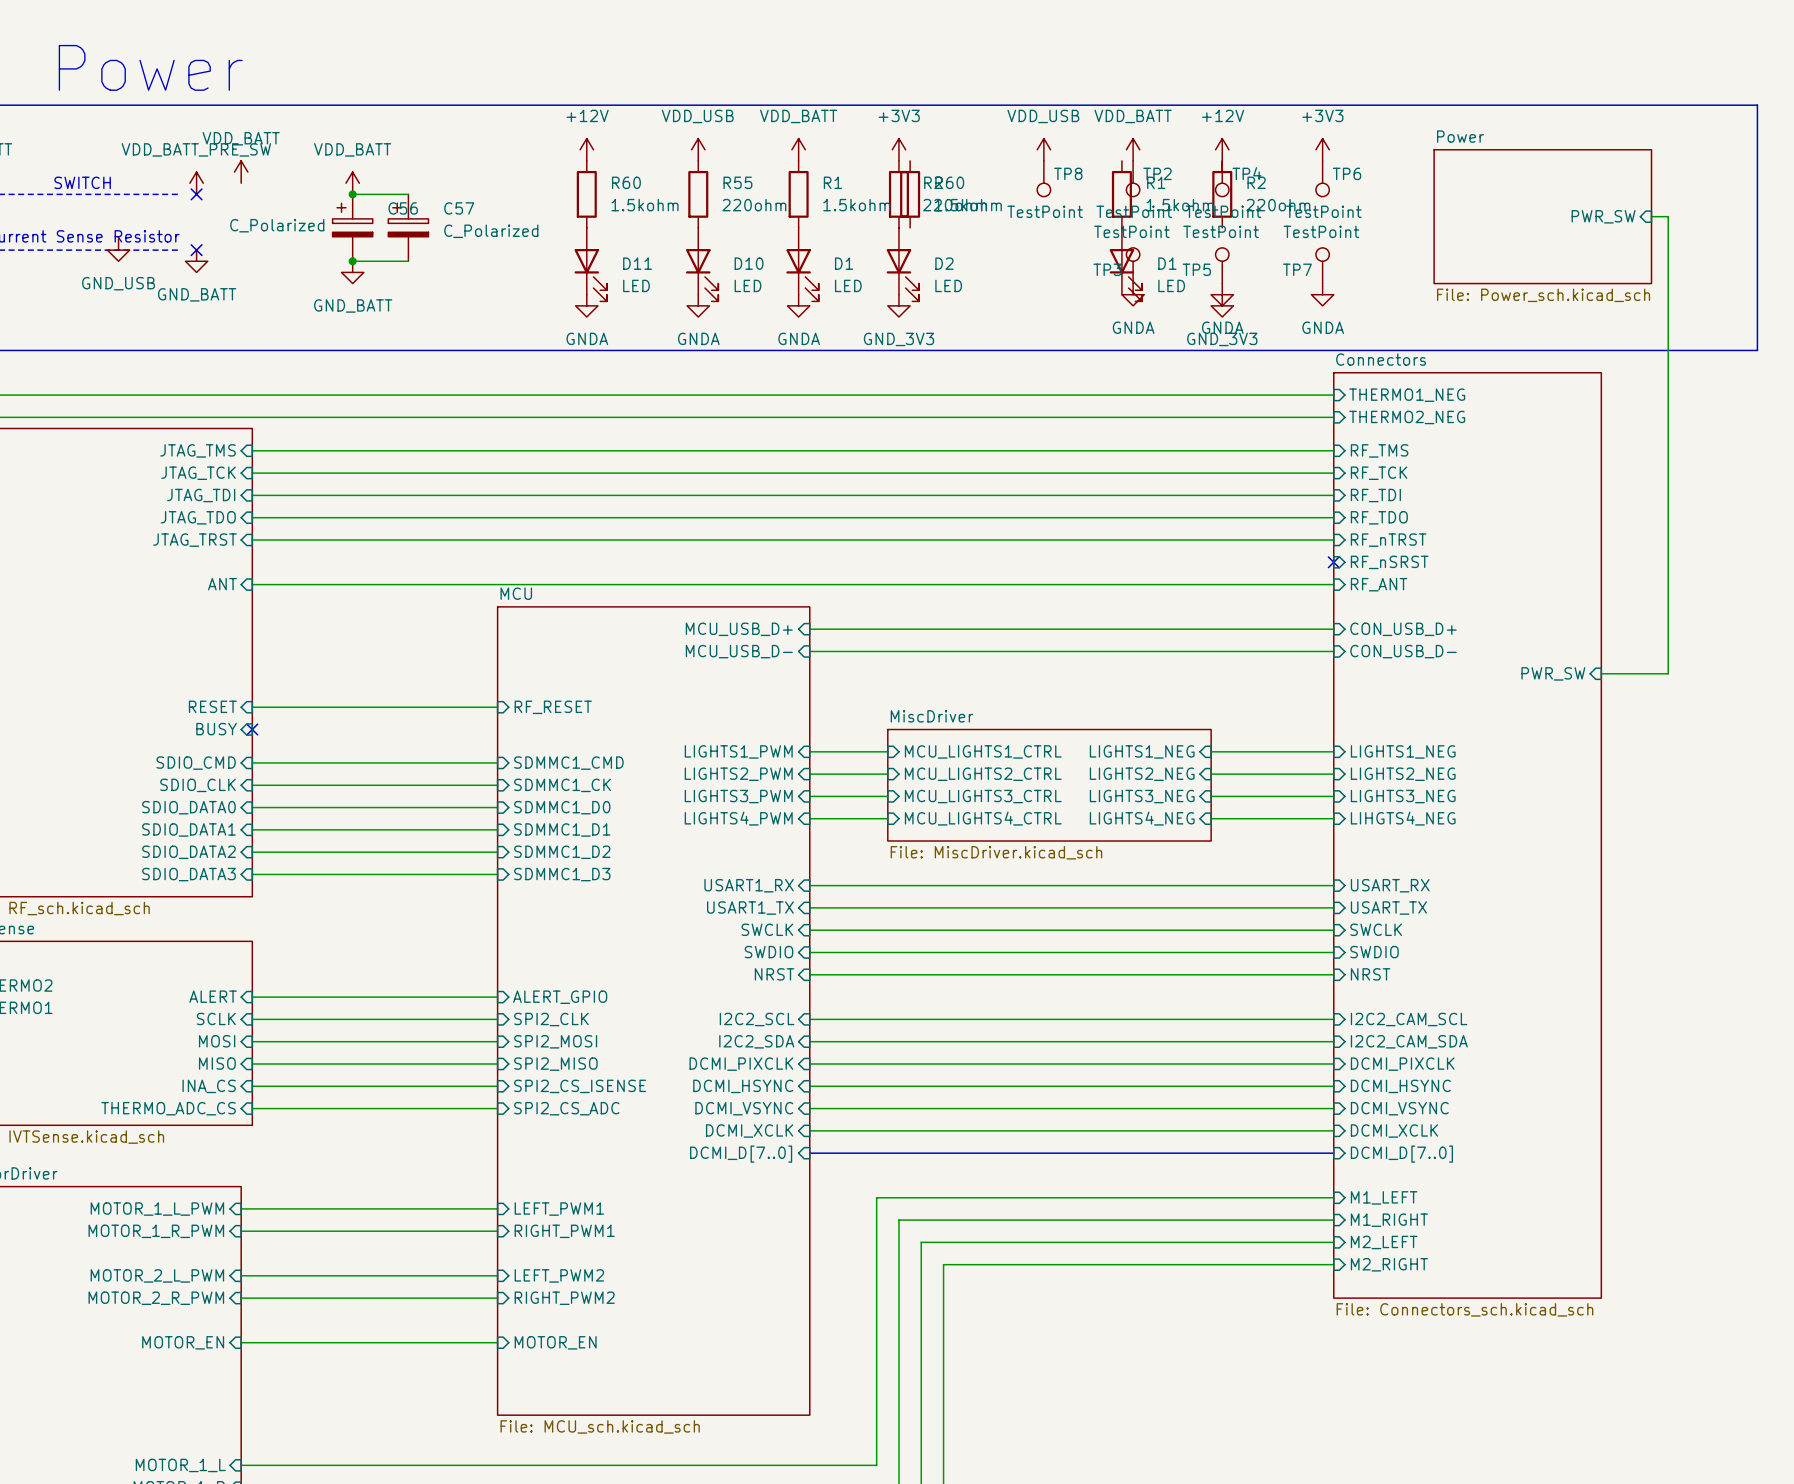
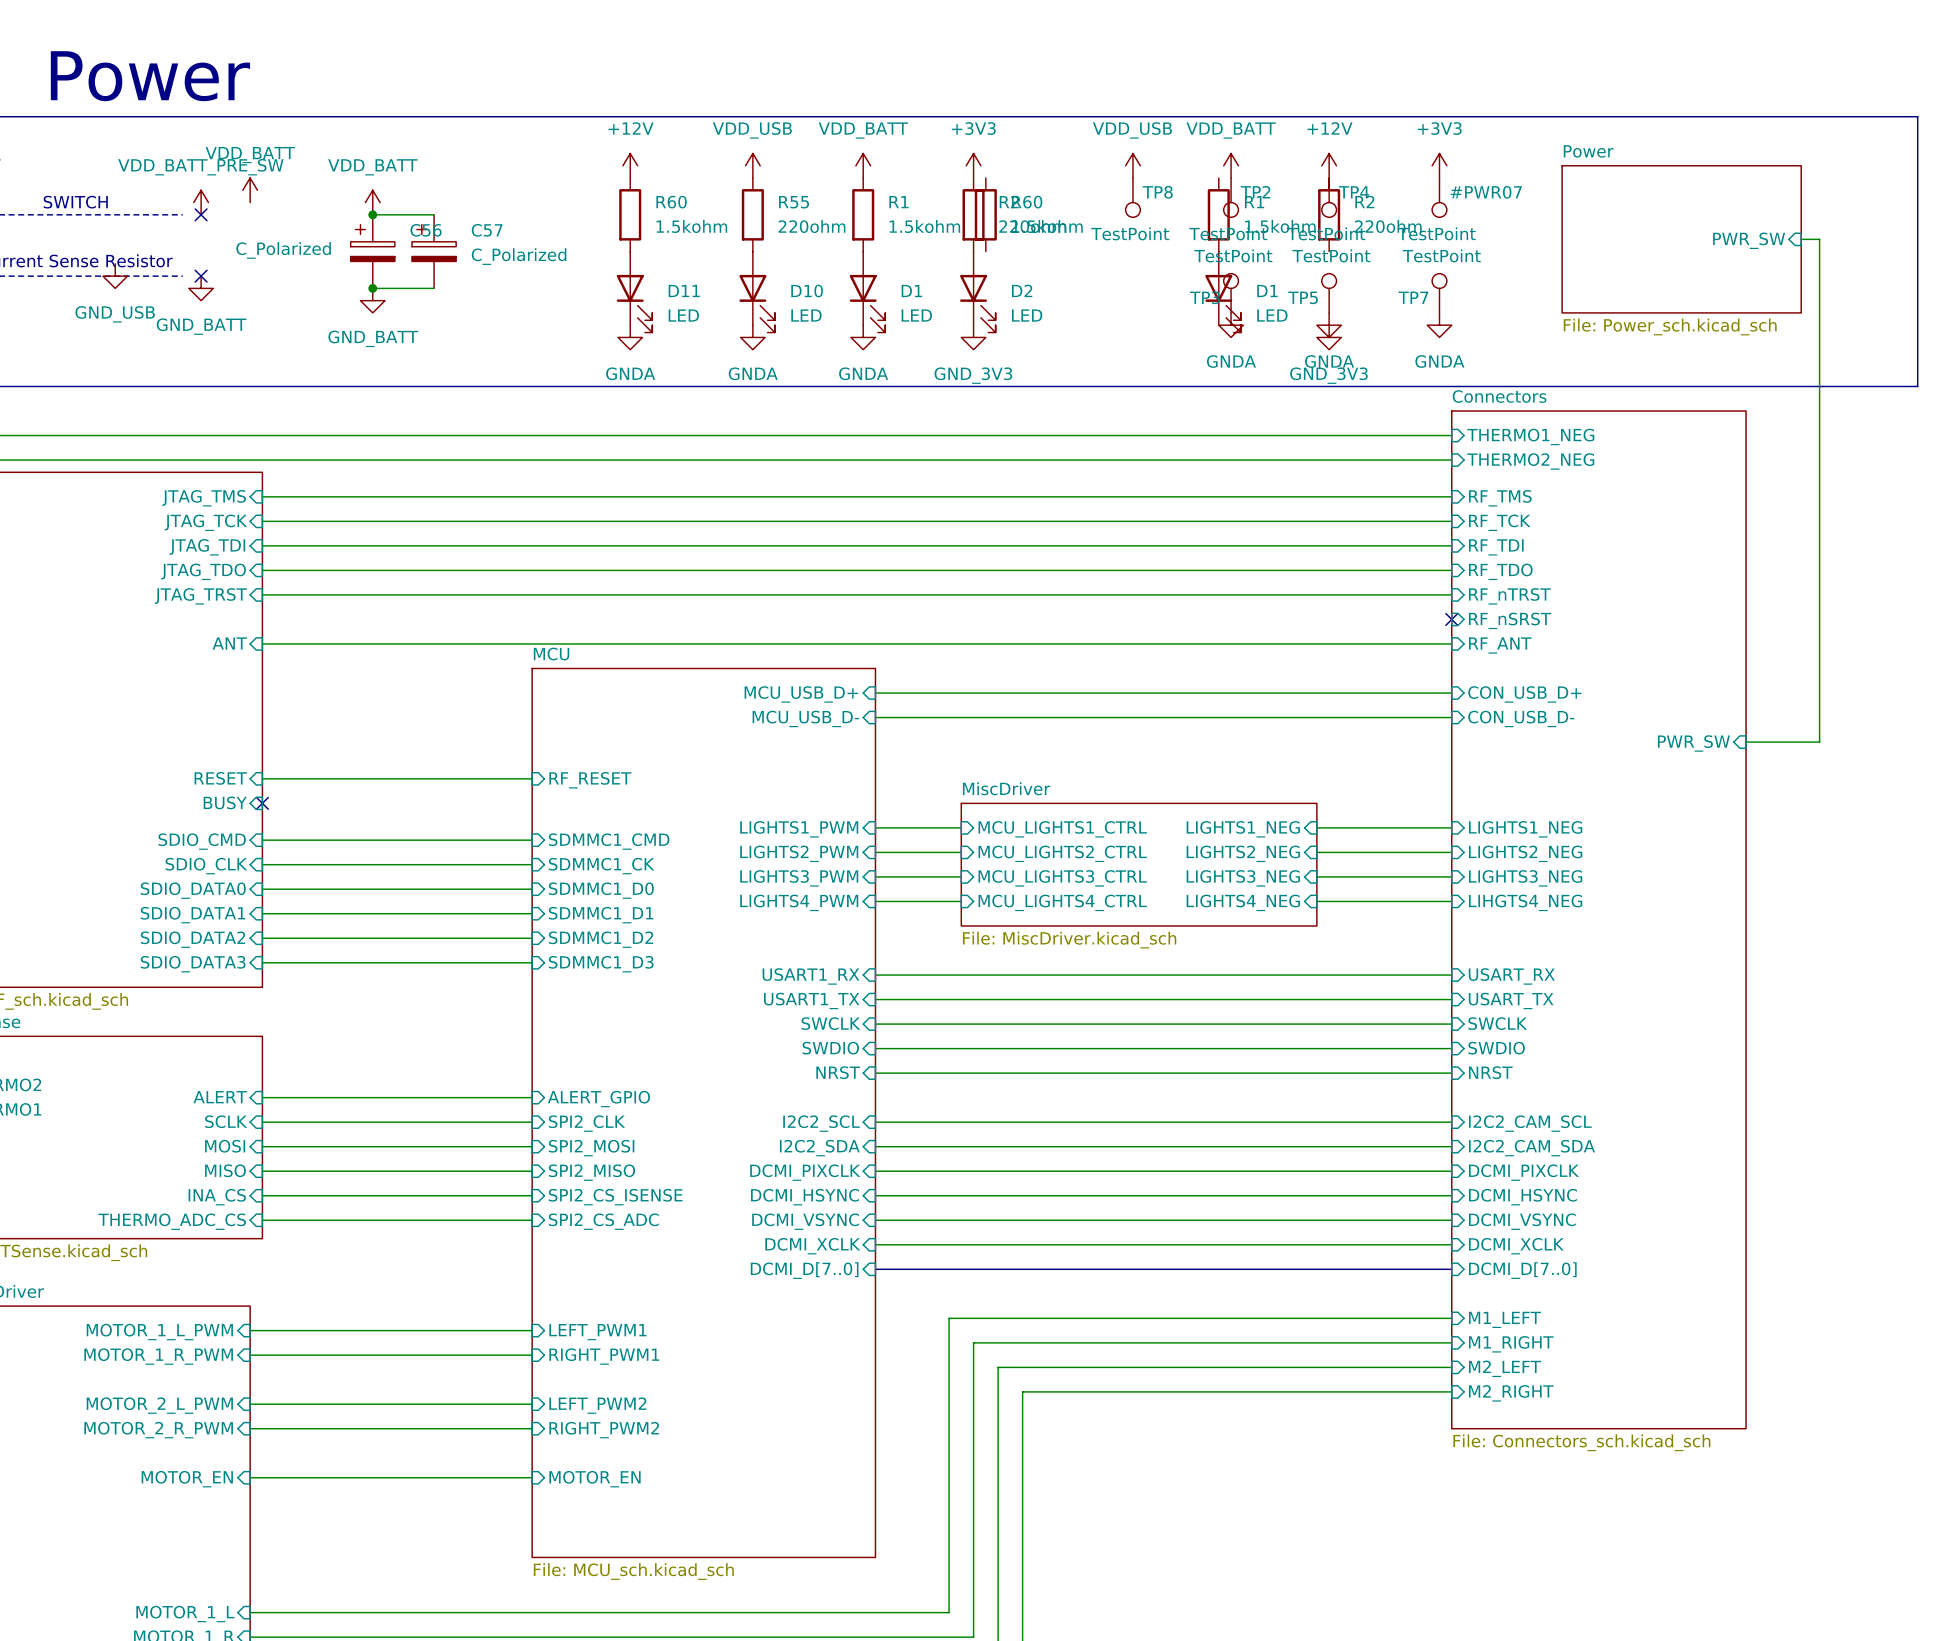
TP6: TestPoint (1322, 178) -> none
#PWR07: none -> TestPoint (1439, 197)

